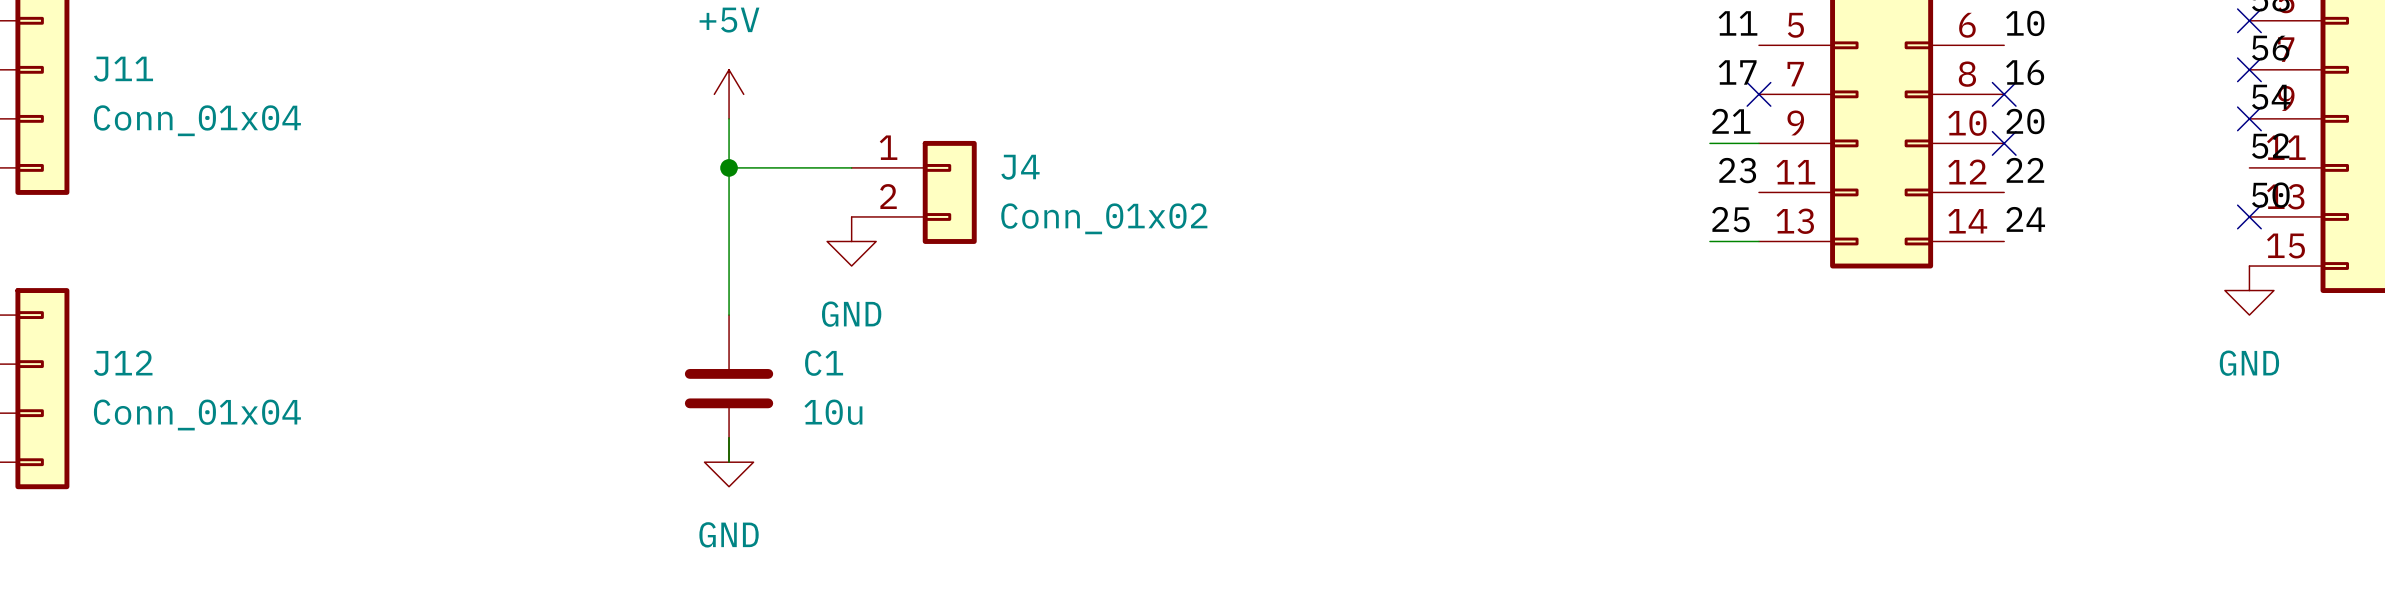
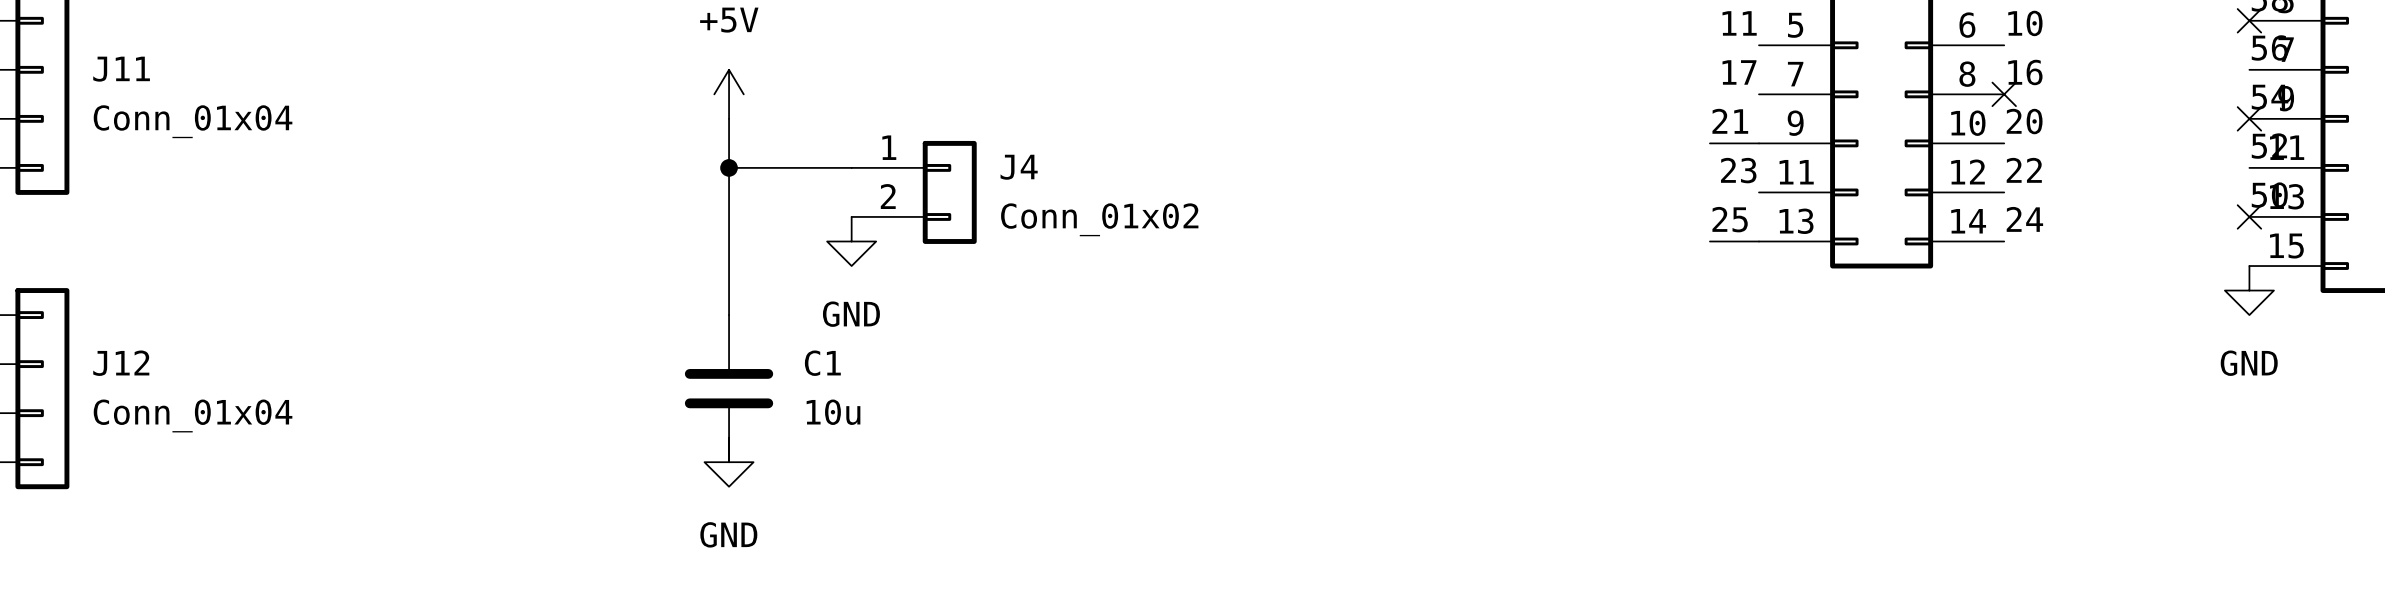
no-connect mark: (2249, 69) -> none
no-connect mark: (1758, 94) -> none
no-connect mark: (2004, 143) -> none

